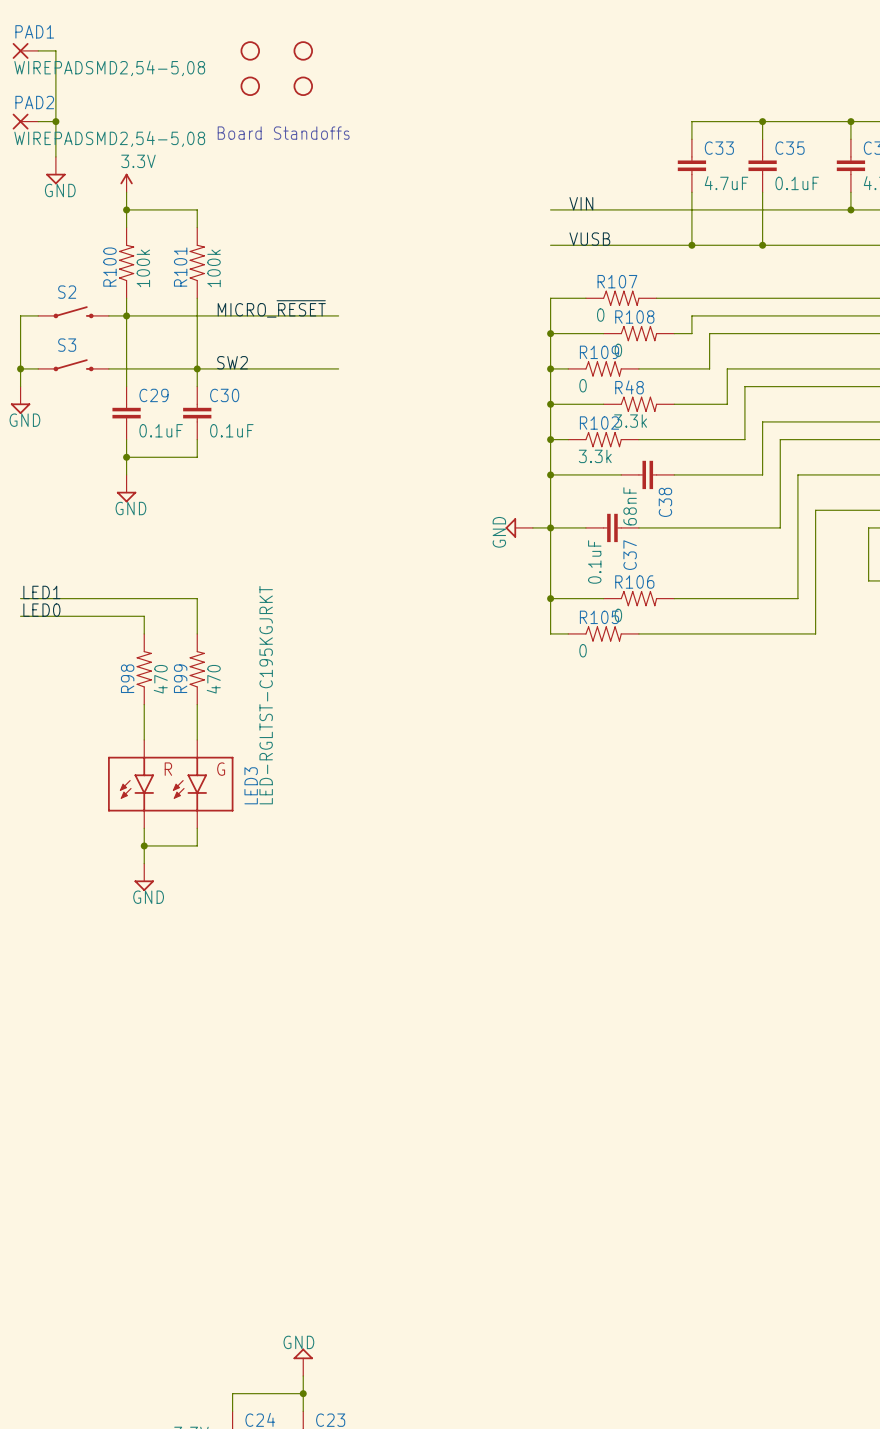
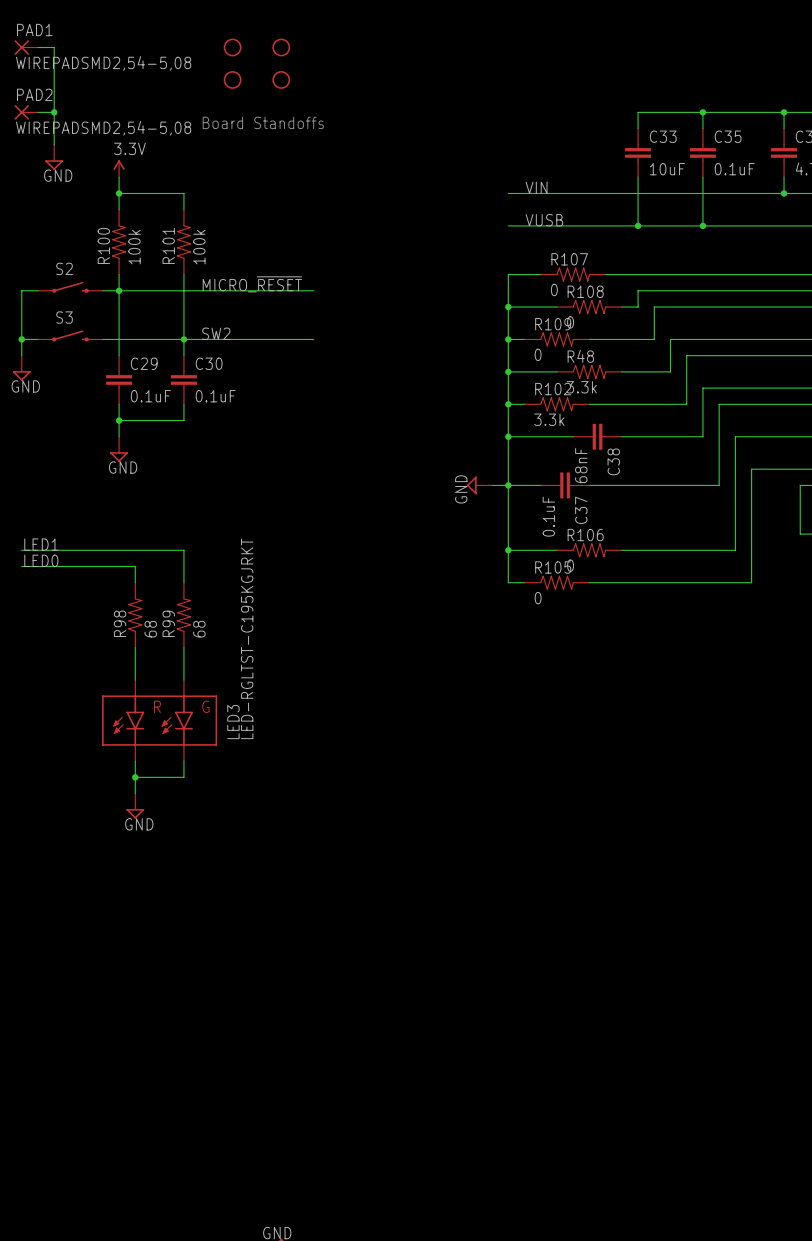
C33 value: 4.7uF (726, 183) -> 10uF (667, 169)
R98 value: 470 (160, 679) -> 68 (150, 629)
R99 value: 470 (213, 679) -> 68 (199, 629)

